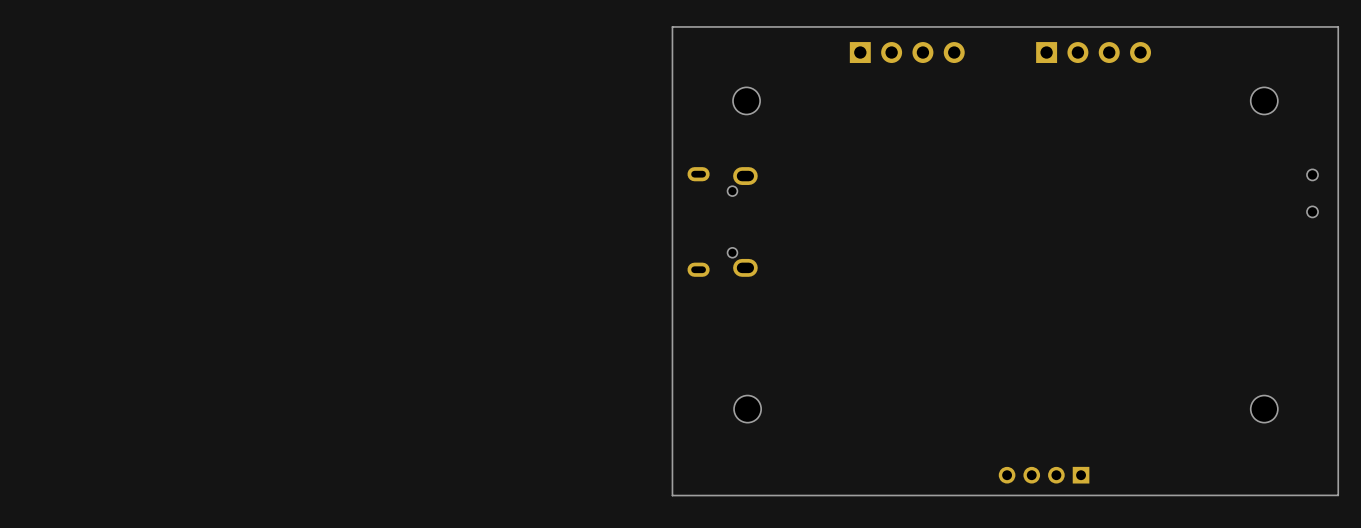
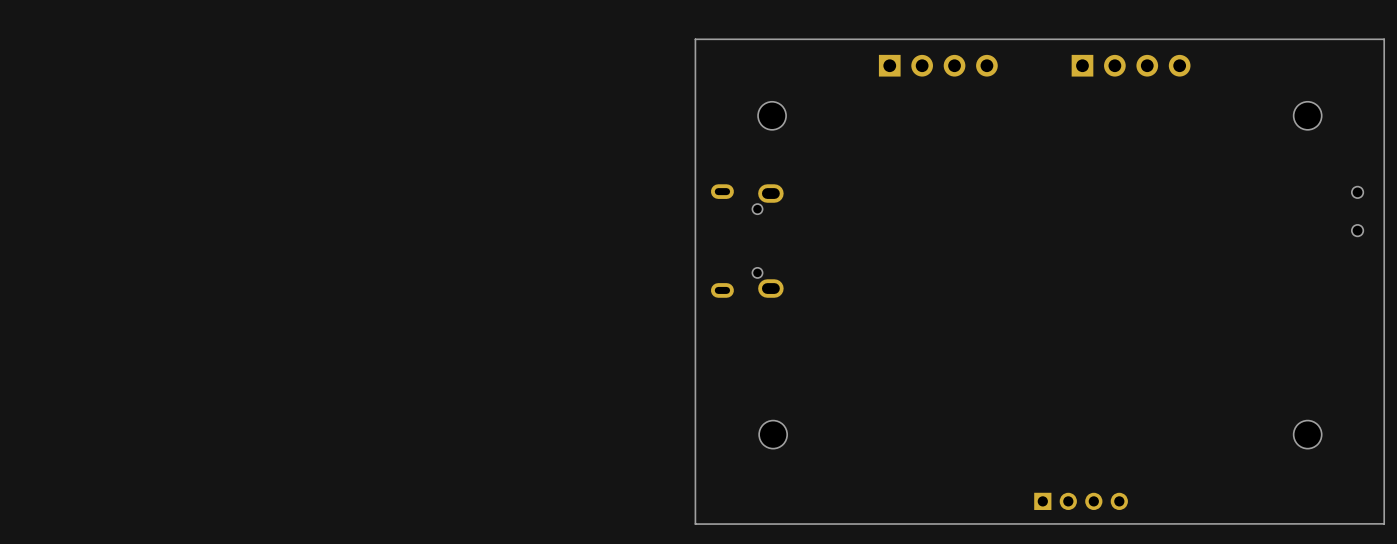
part rotation: 0° (1044, 475) -> 180° (1081, 501)

